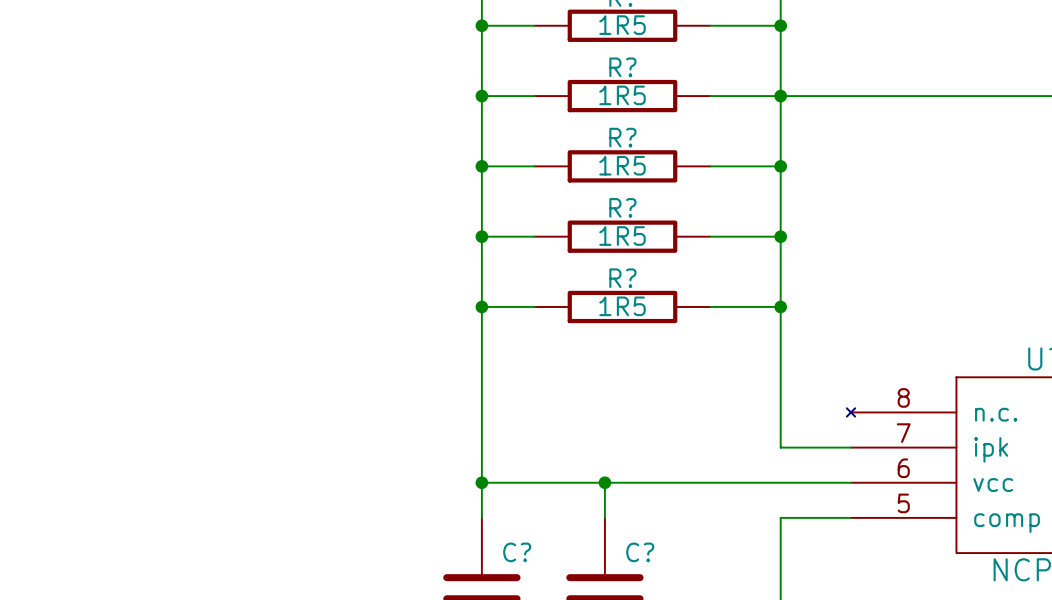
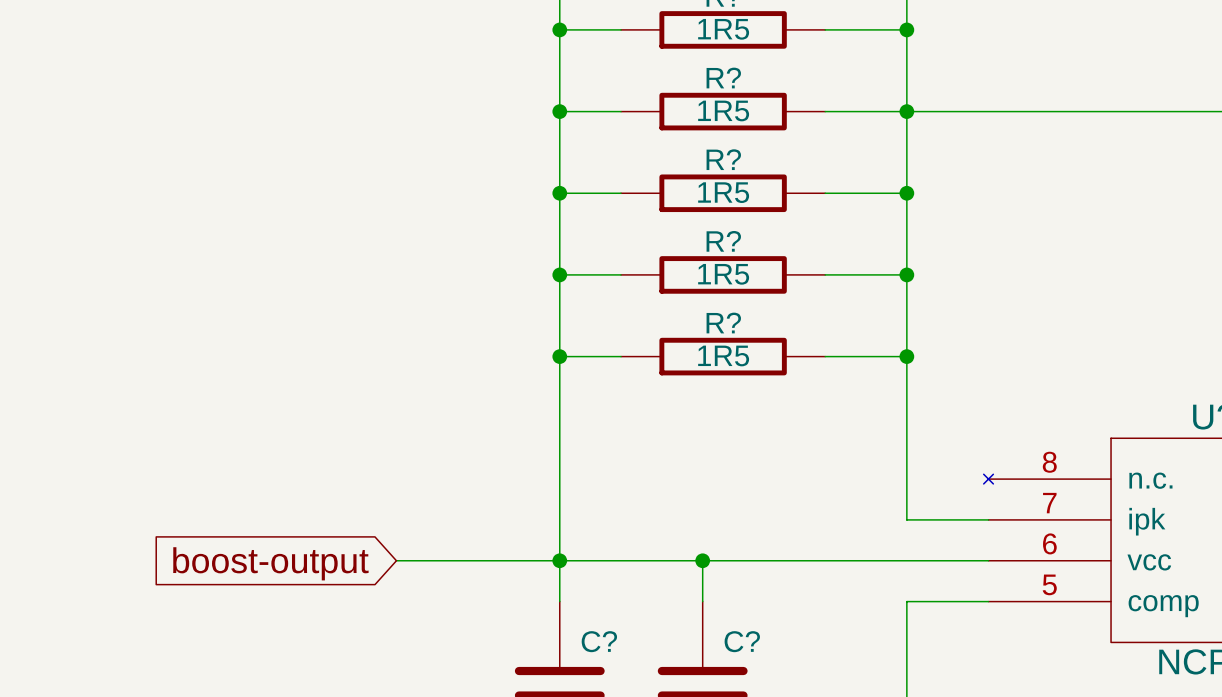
wire: none -> (396, 560) (559, 560)
global label: none -> boost-output (270, 563)

